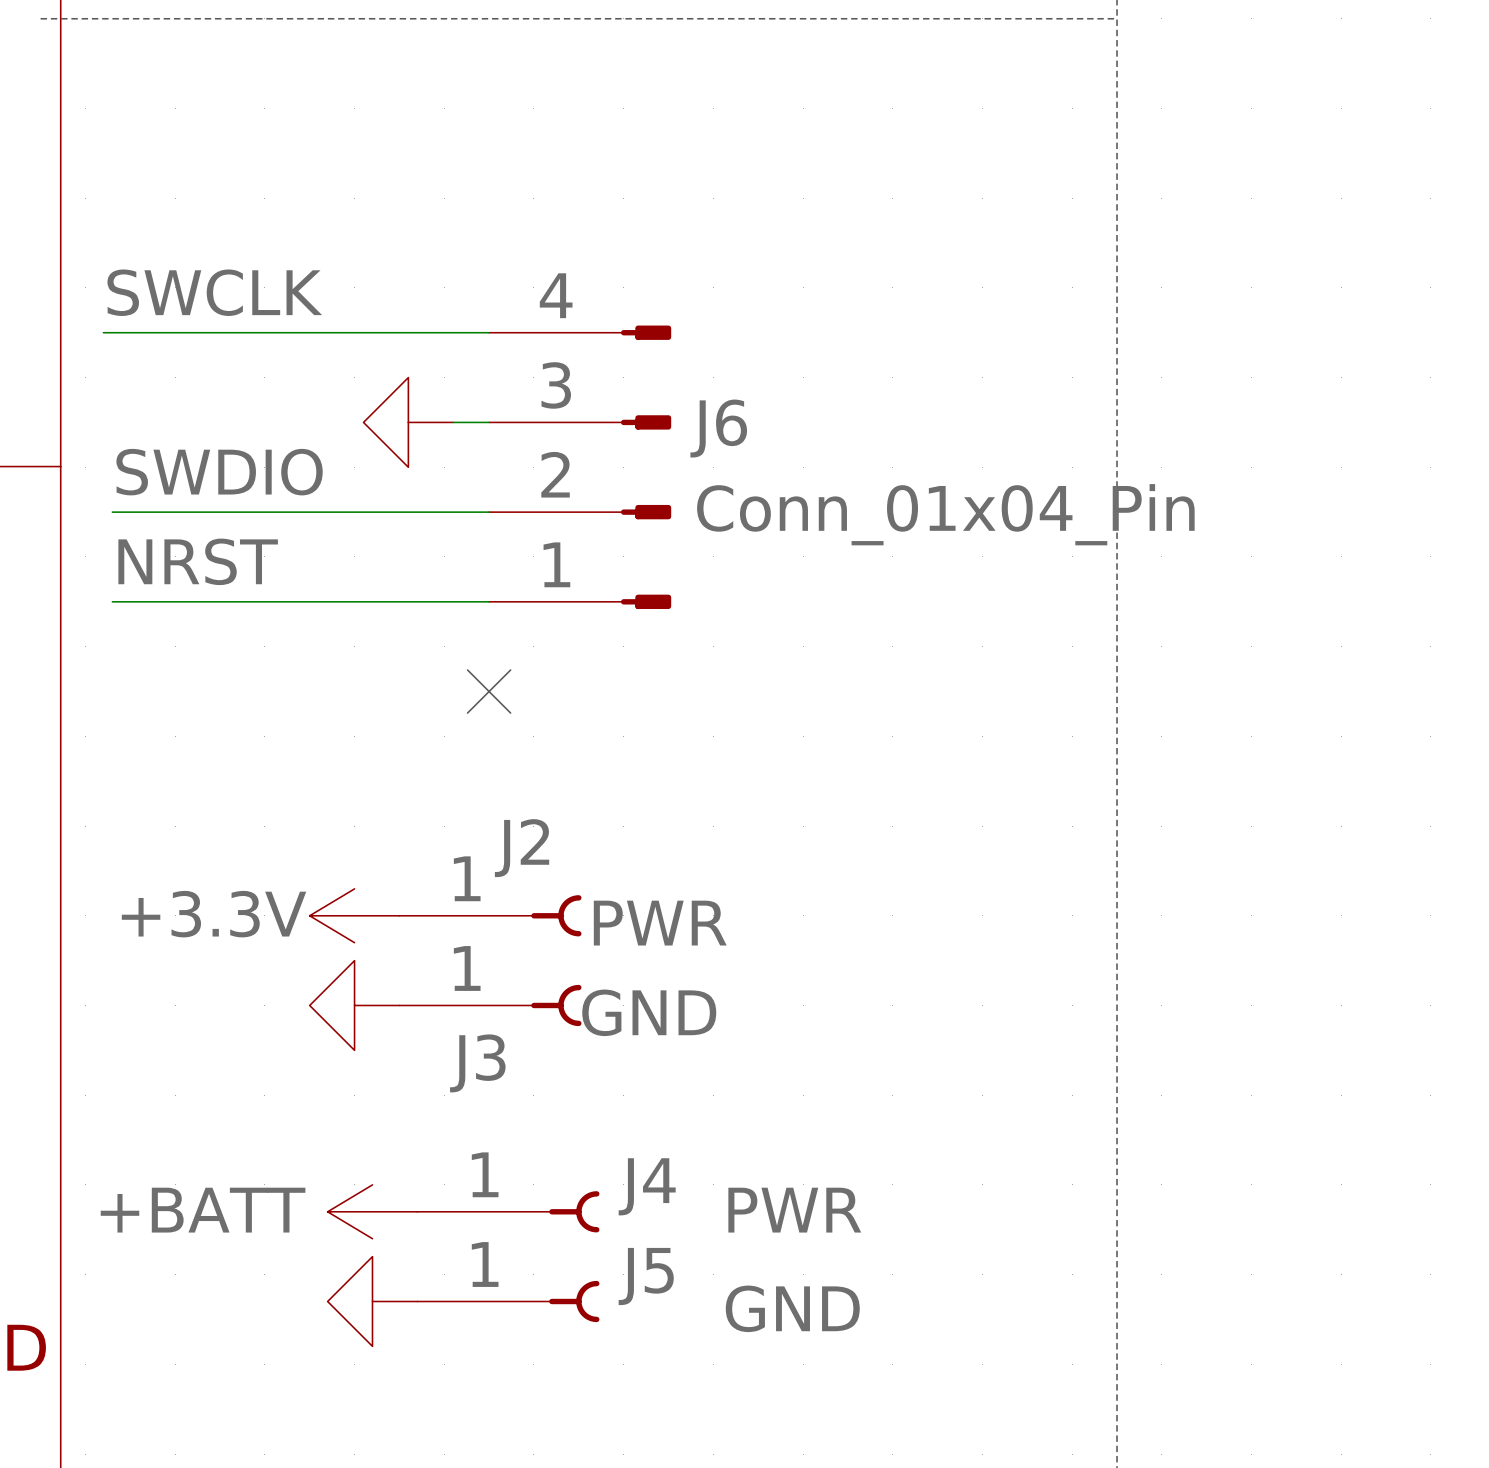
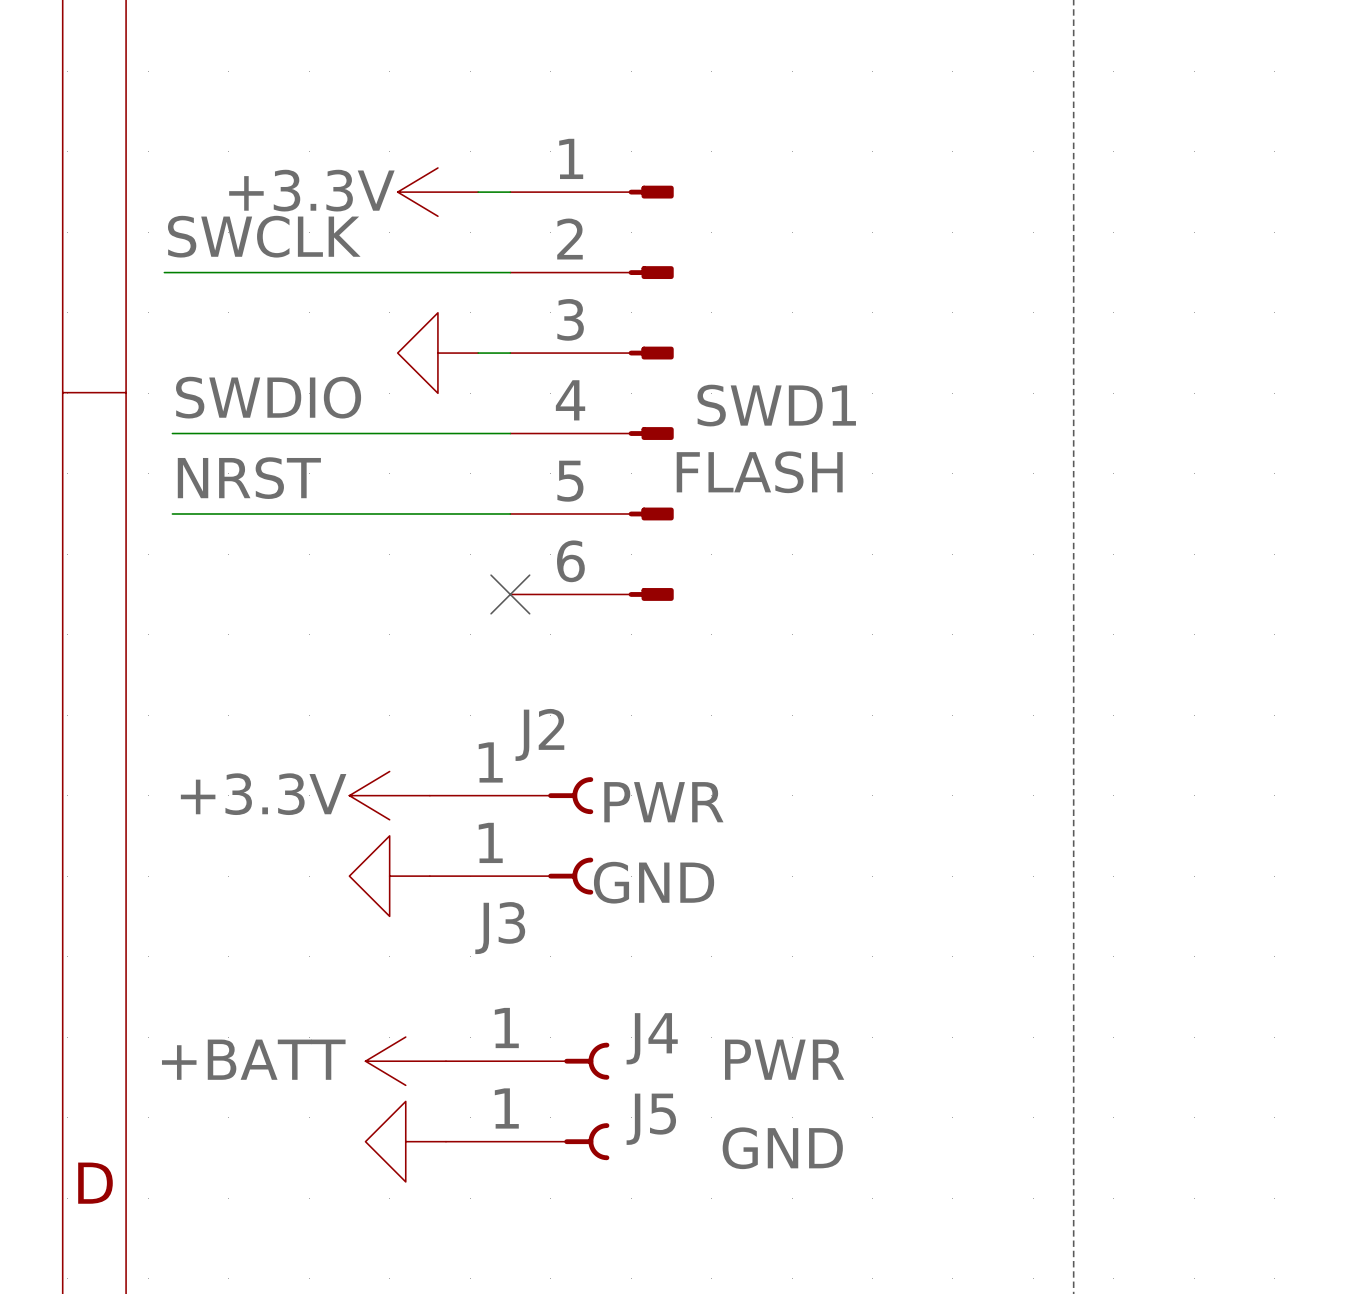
power symbol: none -> +3.3V (437, 192)
wire: none -> (478, 192) (510, 192)
J6: Conn_01x04_Pin (580, 467) -> none
SWD1: none -> FLASH (592, 393)

